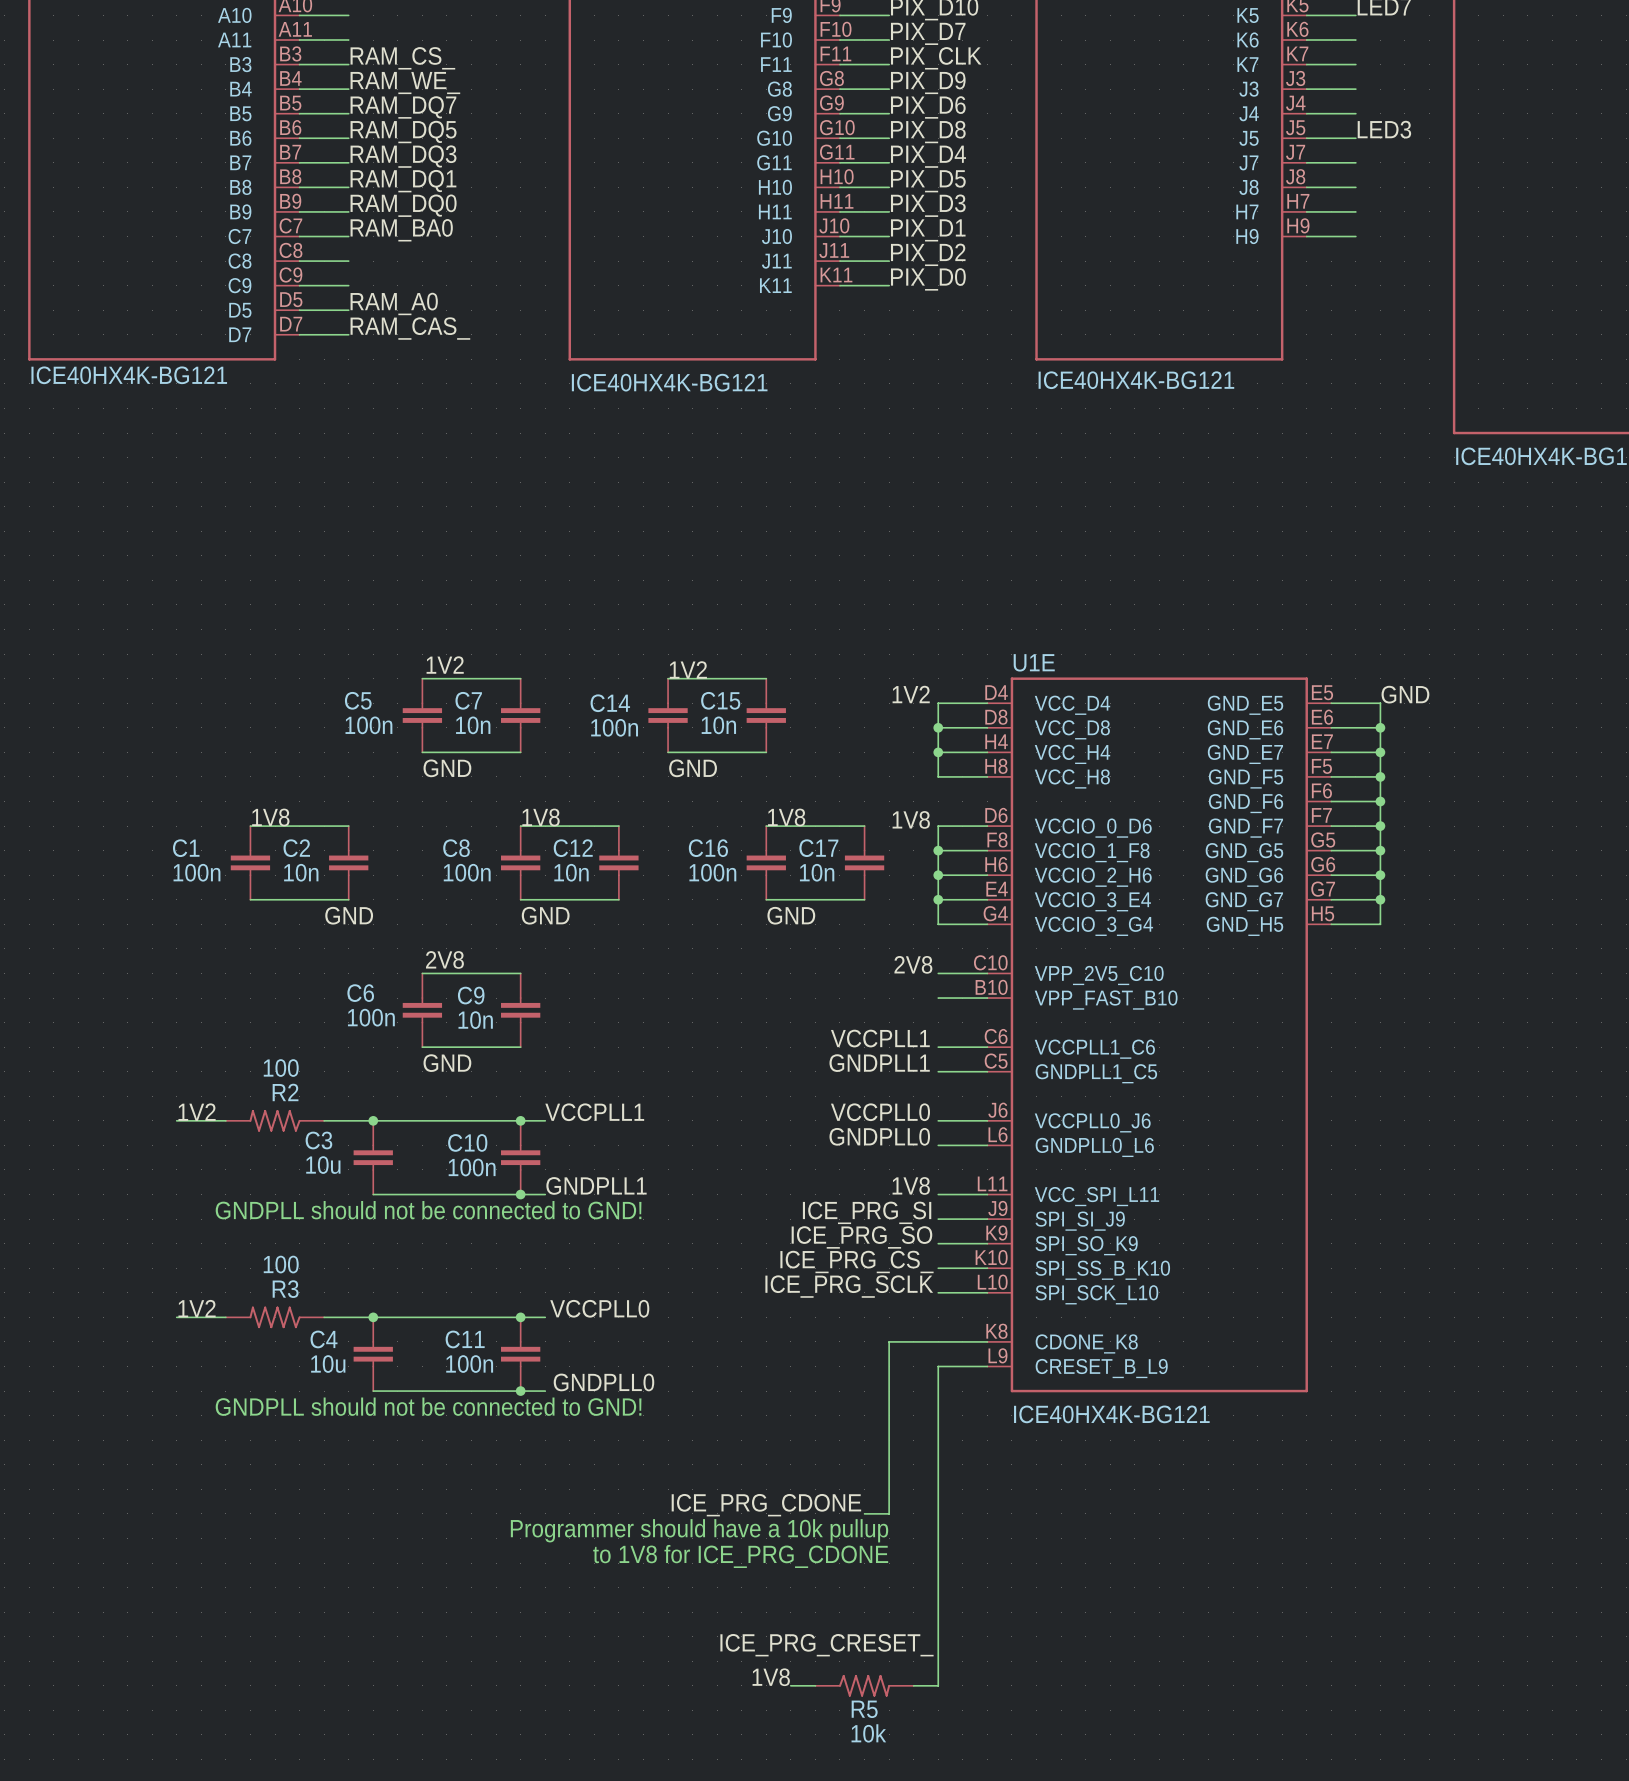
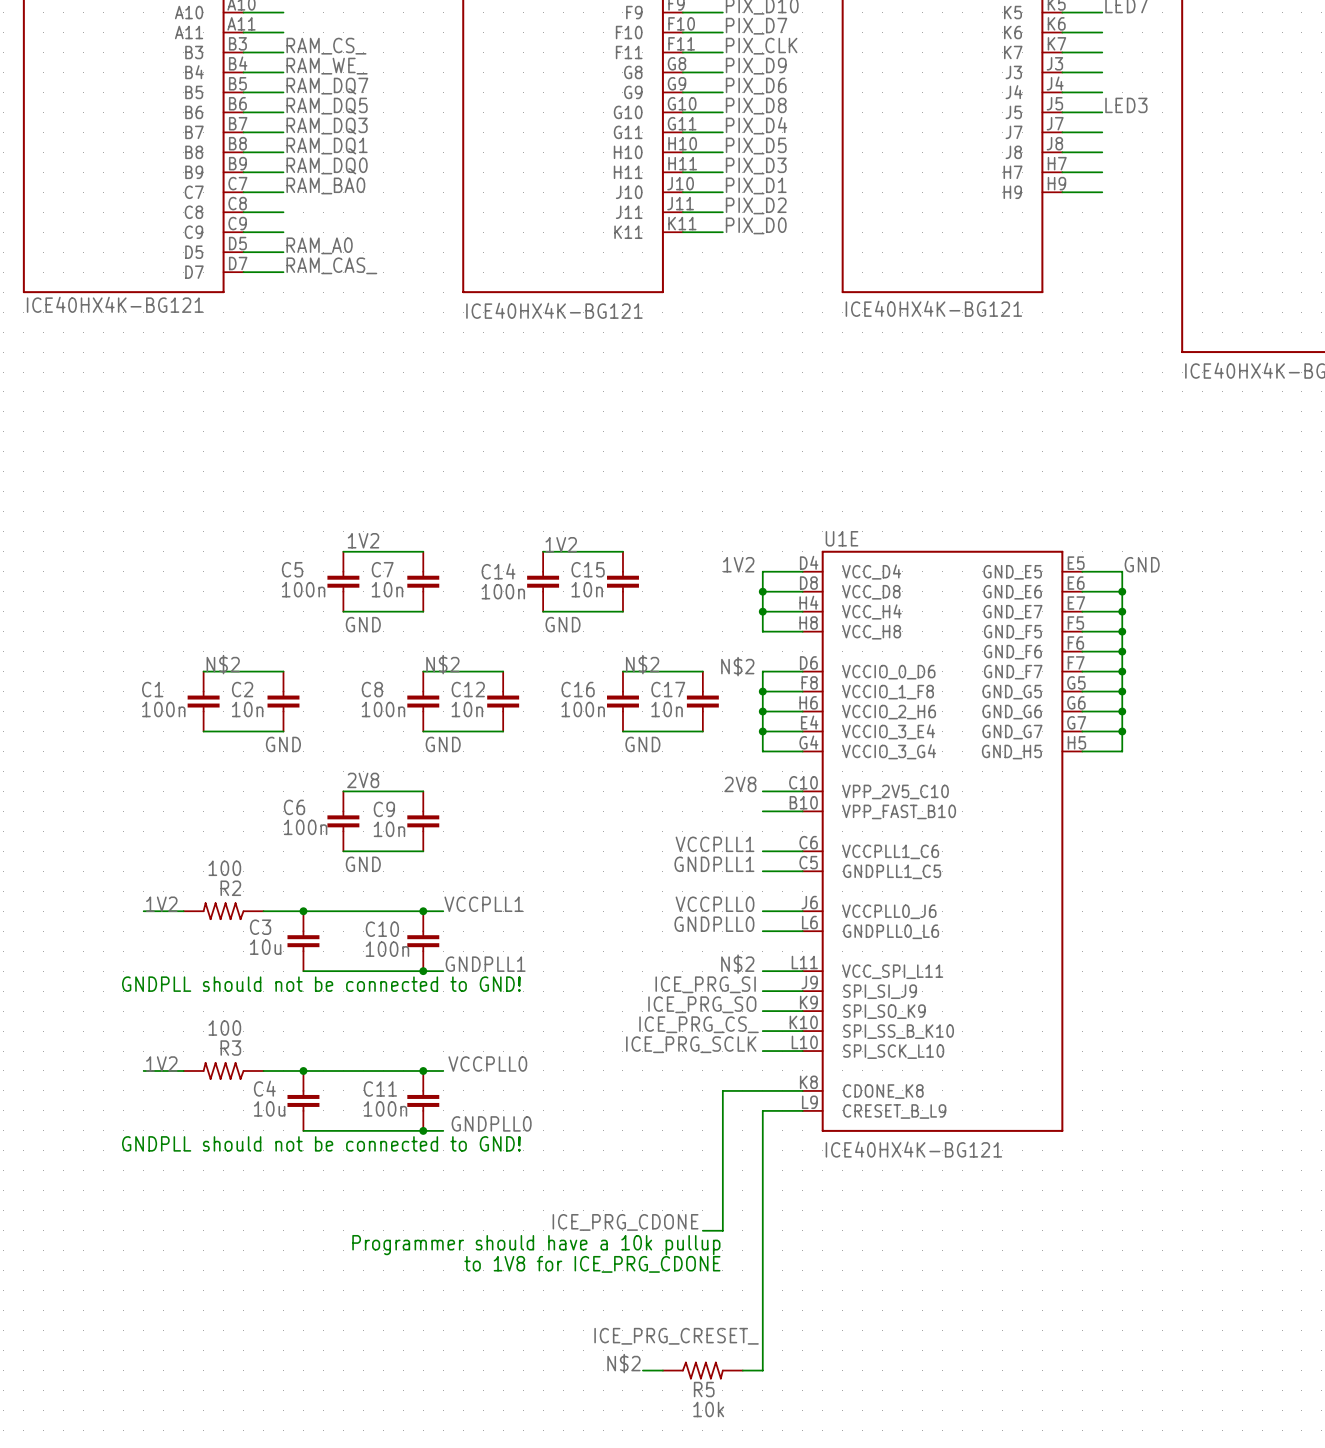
label: 1V8 (270, 817) -> N$2 (223, 664)
label: 1V8 (541, 817) -> N$2 (442, 664)
label: 1V8 (786, 817) -> N$2 (642, 664)
label: 1V8 (911, 819) -> N$2 (737, 666)
label: 1V8 (911, 1185) -> N$2 (737, 964)
label: 1V8 (771, 1677) -> N$2 (623, 1363)

